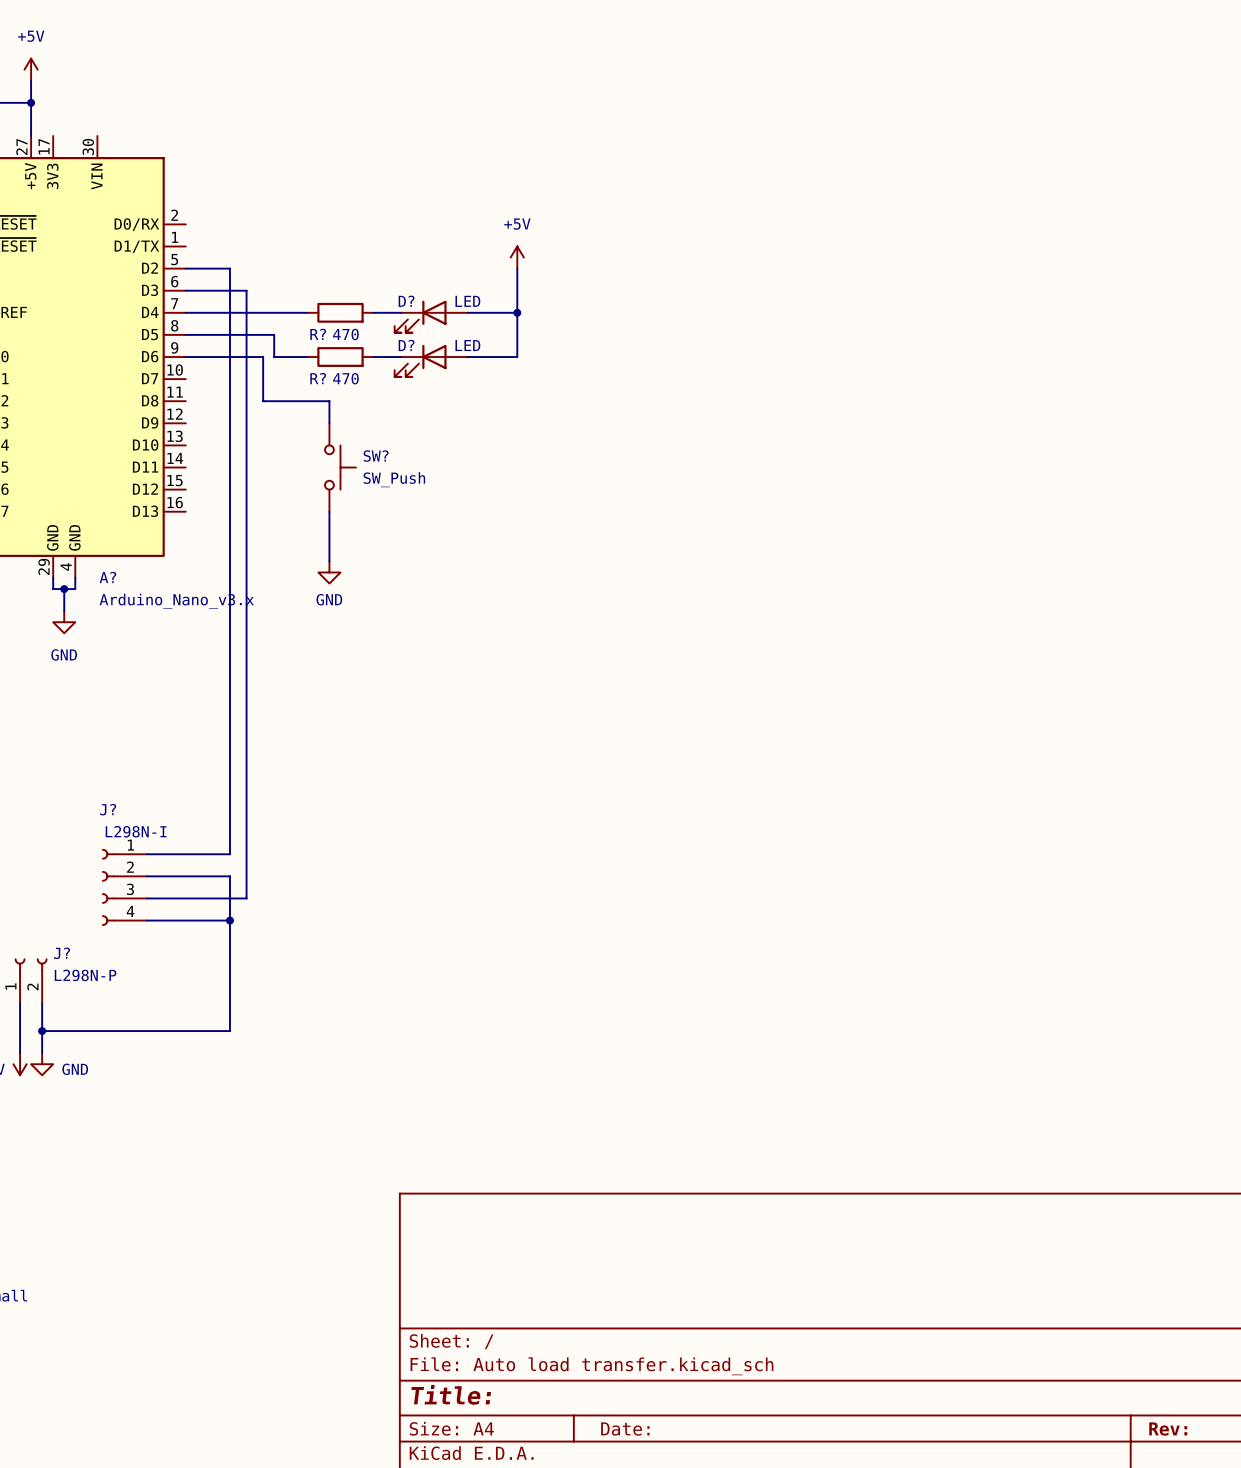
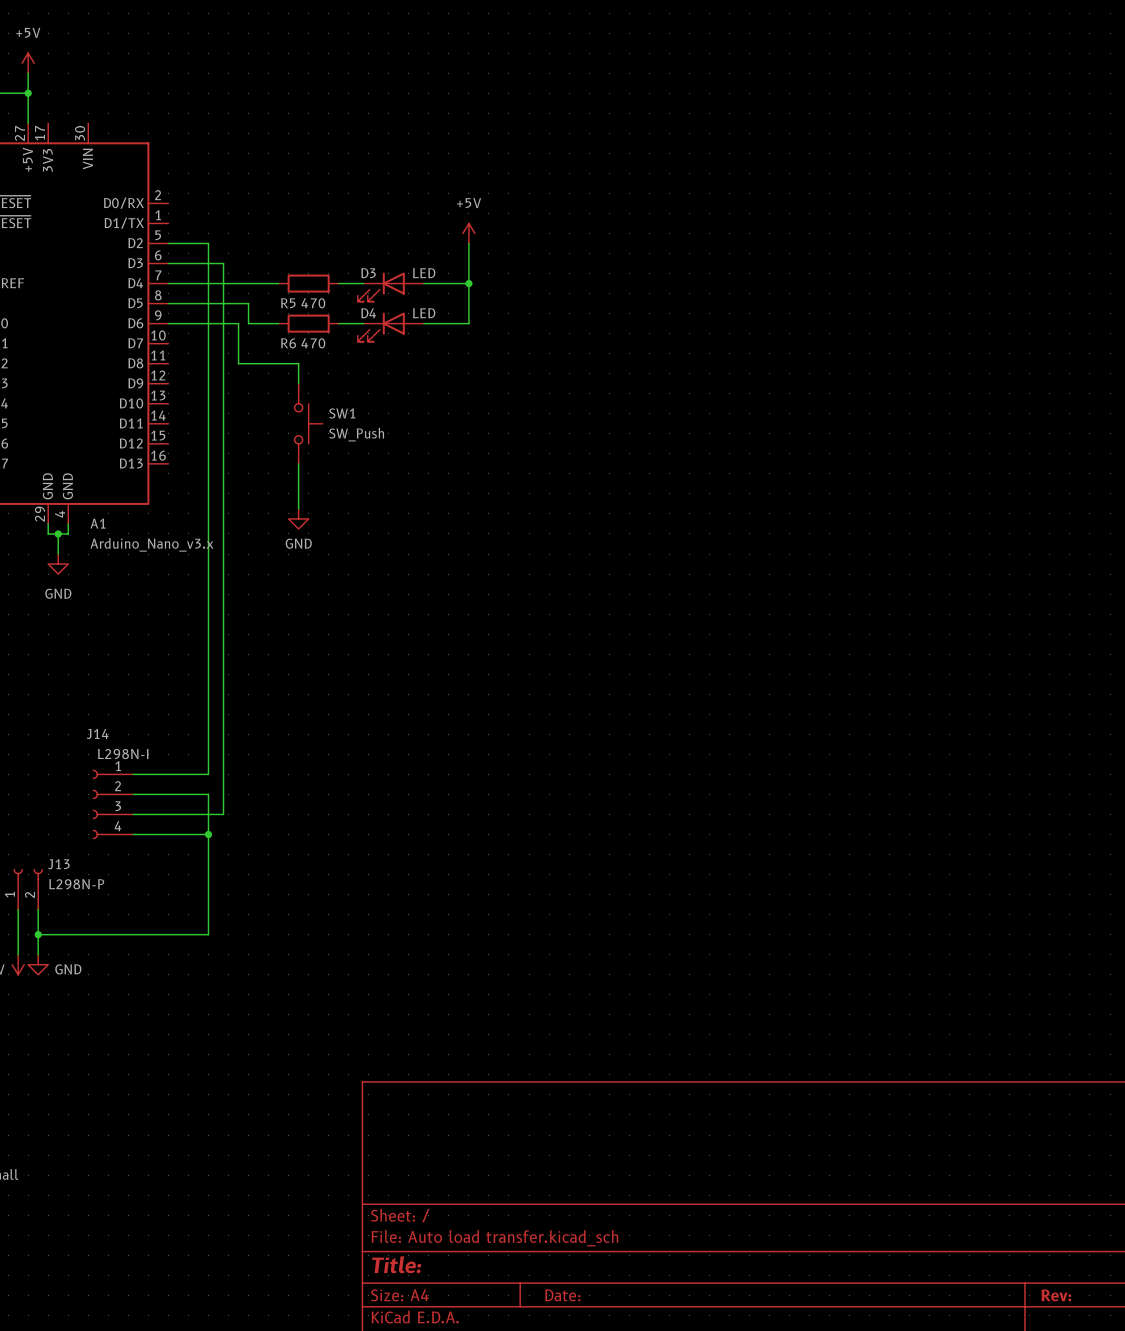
D? name: D? (406, 301) -> D3 (368, 273)
R? name: R? (318, 334) -> R5 (288, 303)
D? name: D? (406, 345) -> D4 (368, 313)
R? name: R? (318, 378) -> R6 (288, 343)
SW? name: SW? (376, 456) -> SW1 (342, 413)
A? name: A? (107, 577) -> A1 (98, 523)
J? name: J? (108, 809) -> J14 (97, 734)
J? name: J? (62, 953) -> J13 (58, 864)

